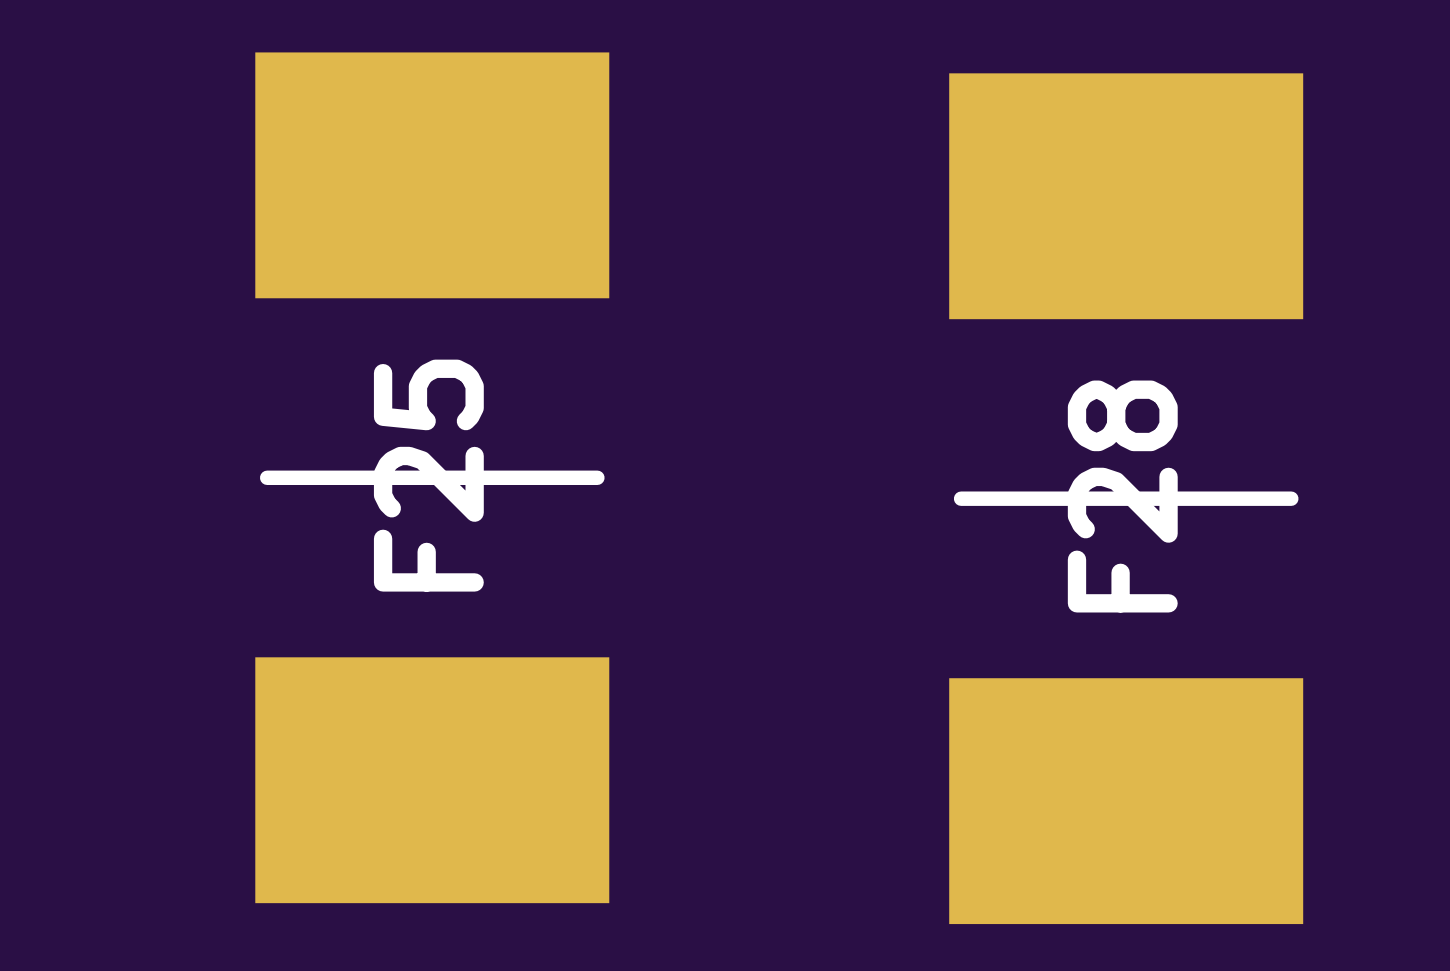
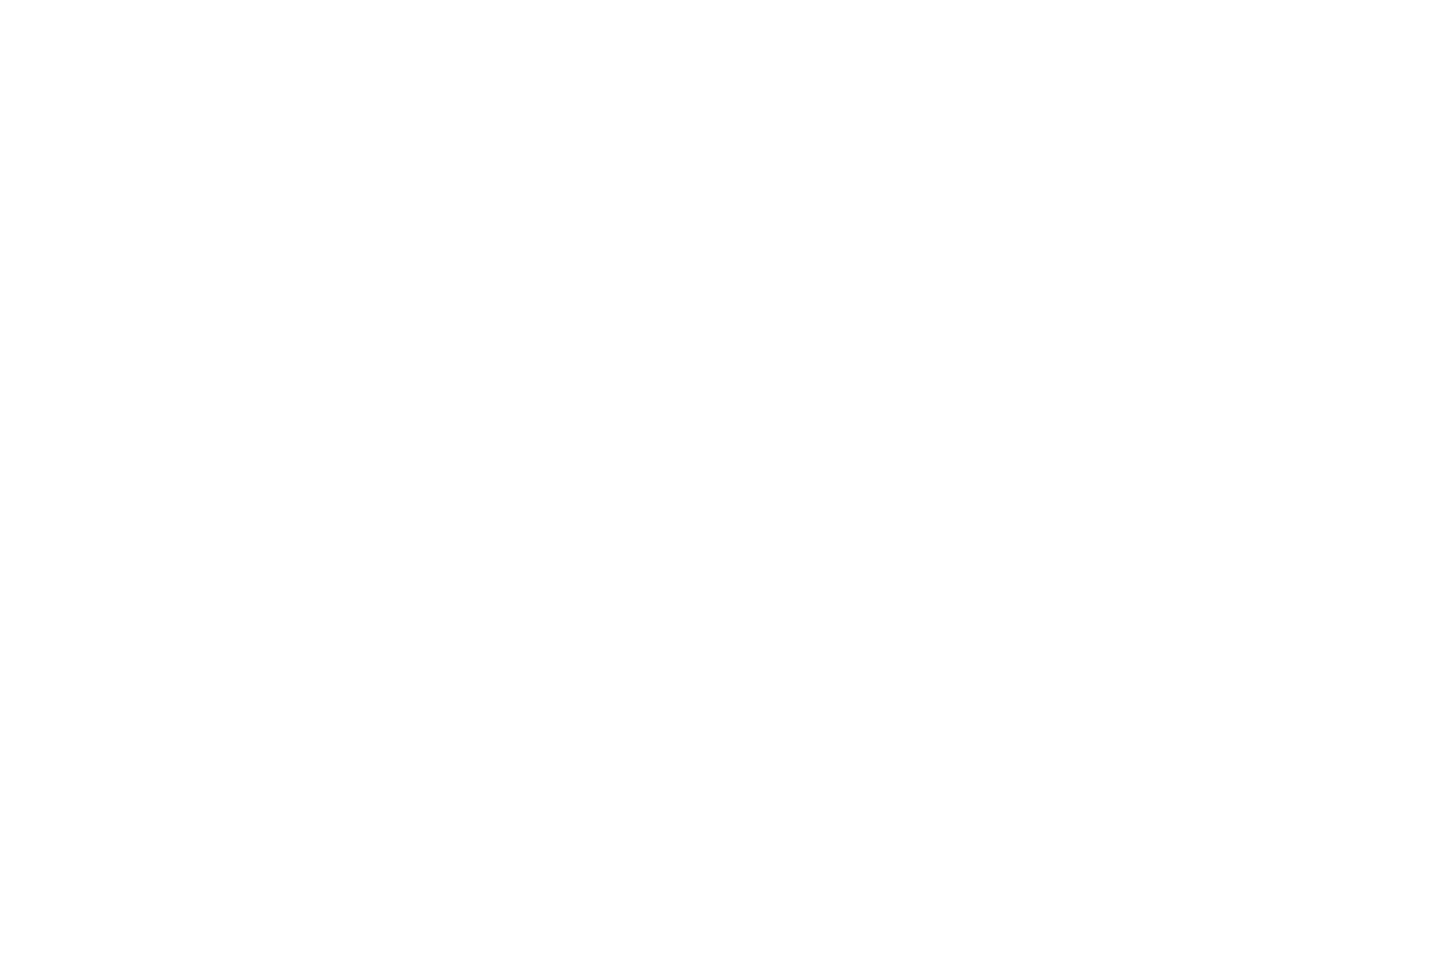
F25: (432, 477) -> none
F28: (1126, 498) -> none

